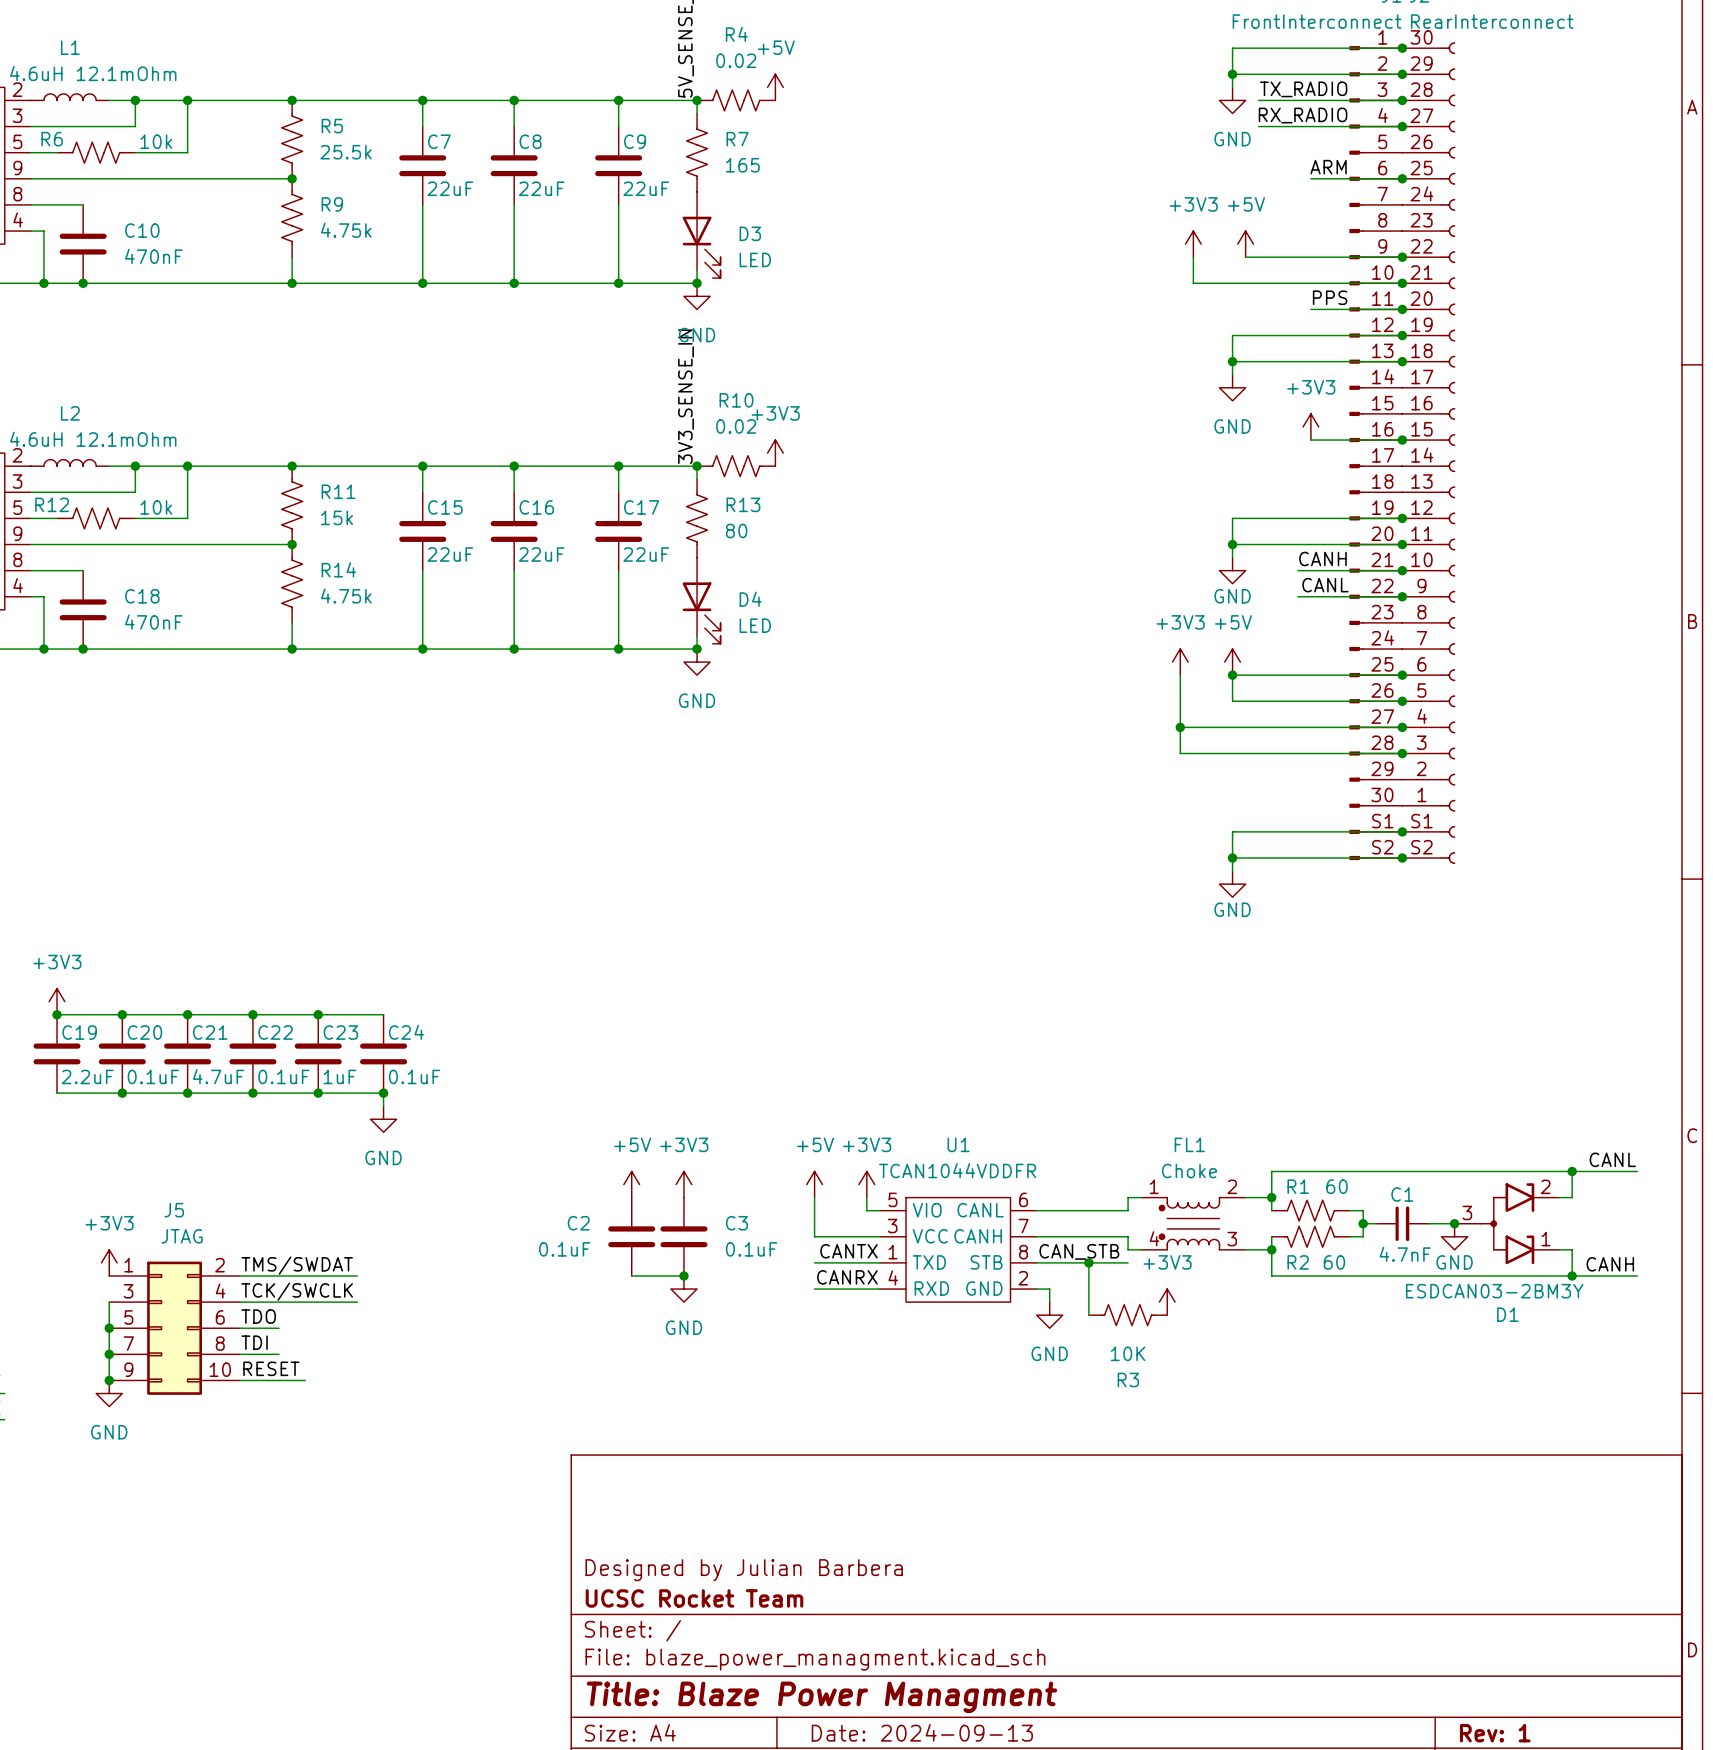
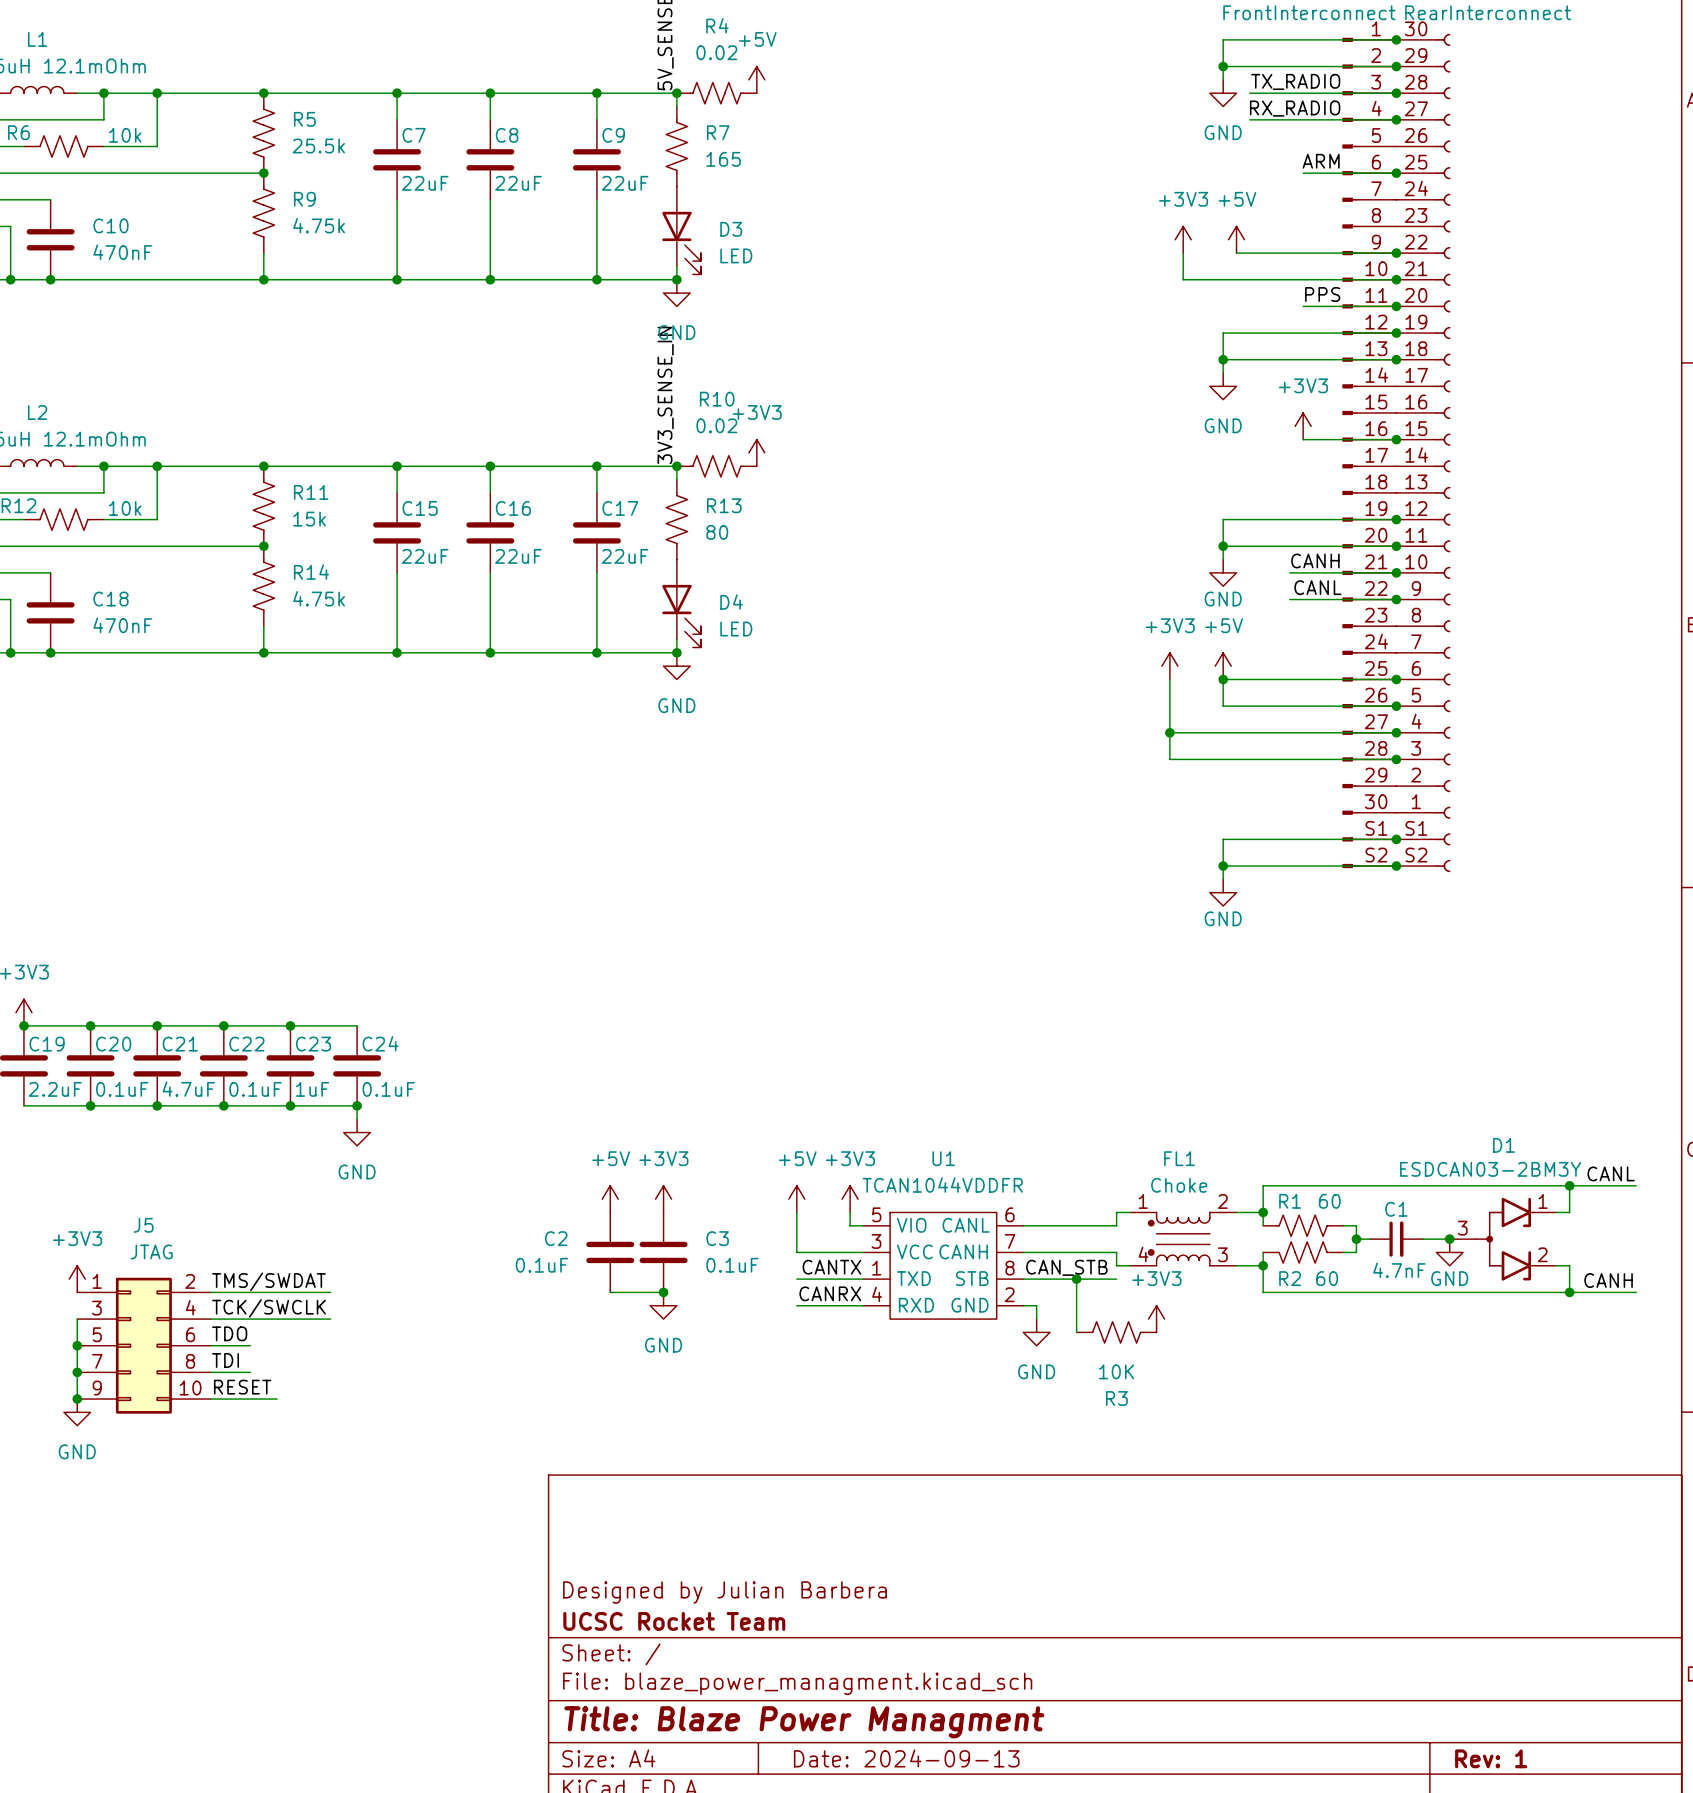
D1 flip: as is (1507, 1223) -> up-down (1503, 1239)

